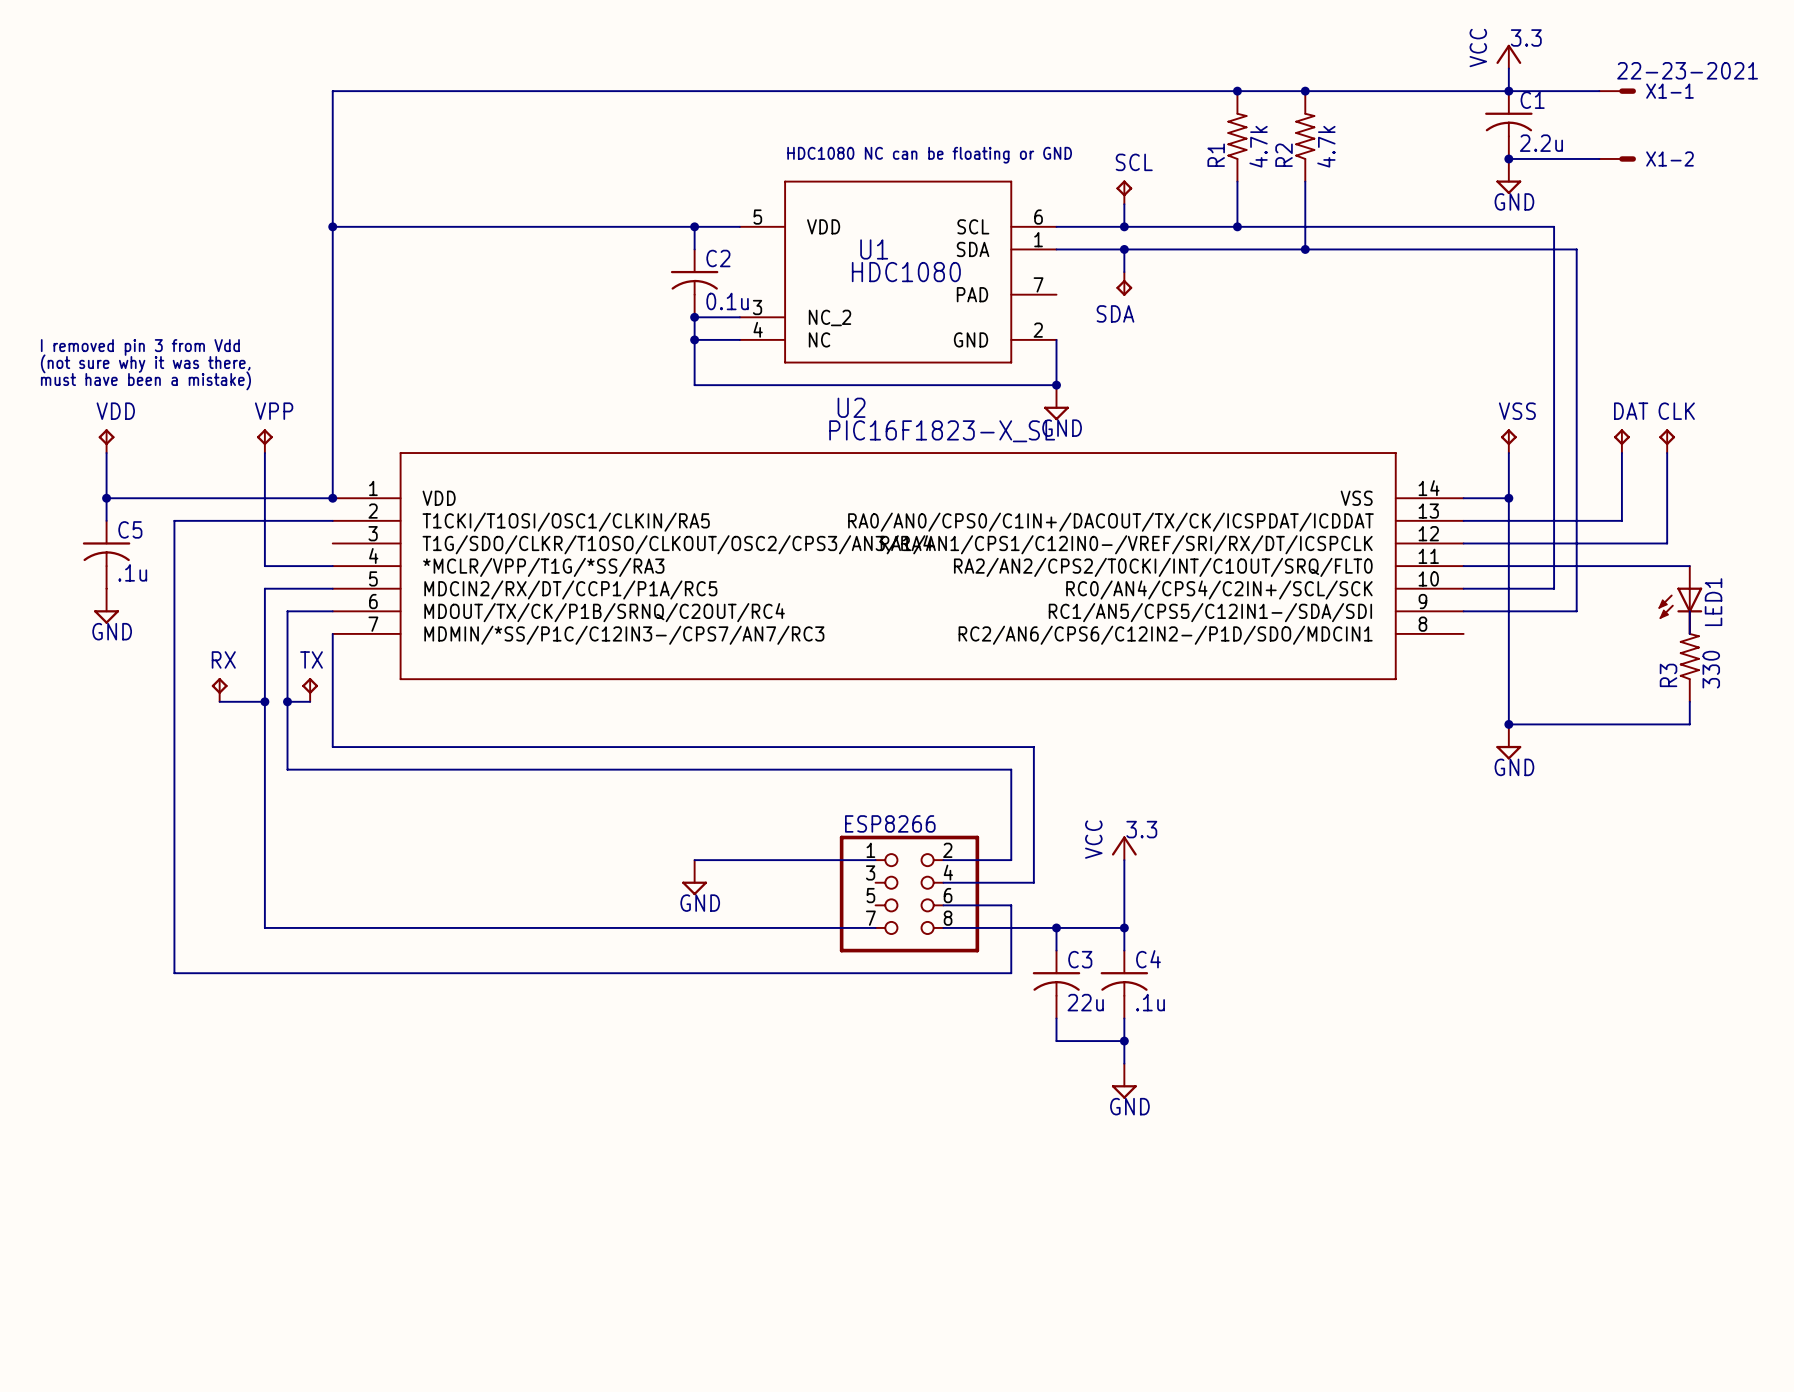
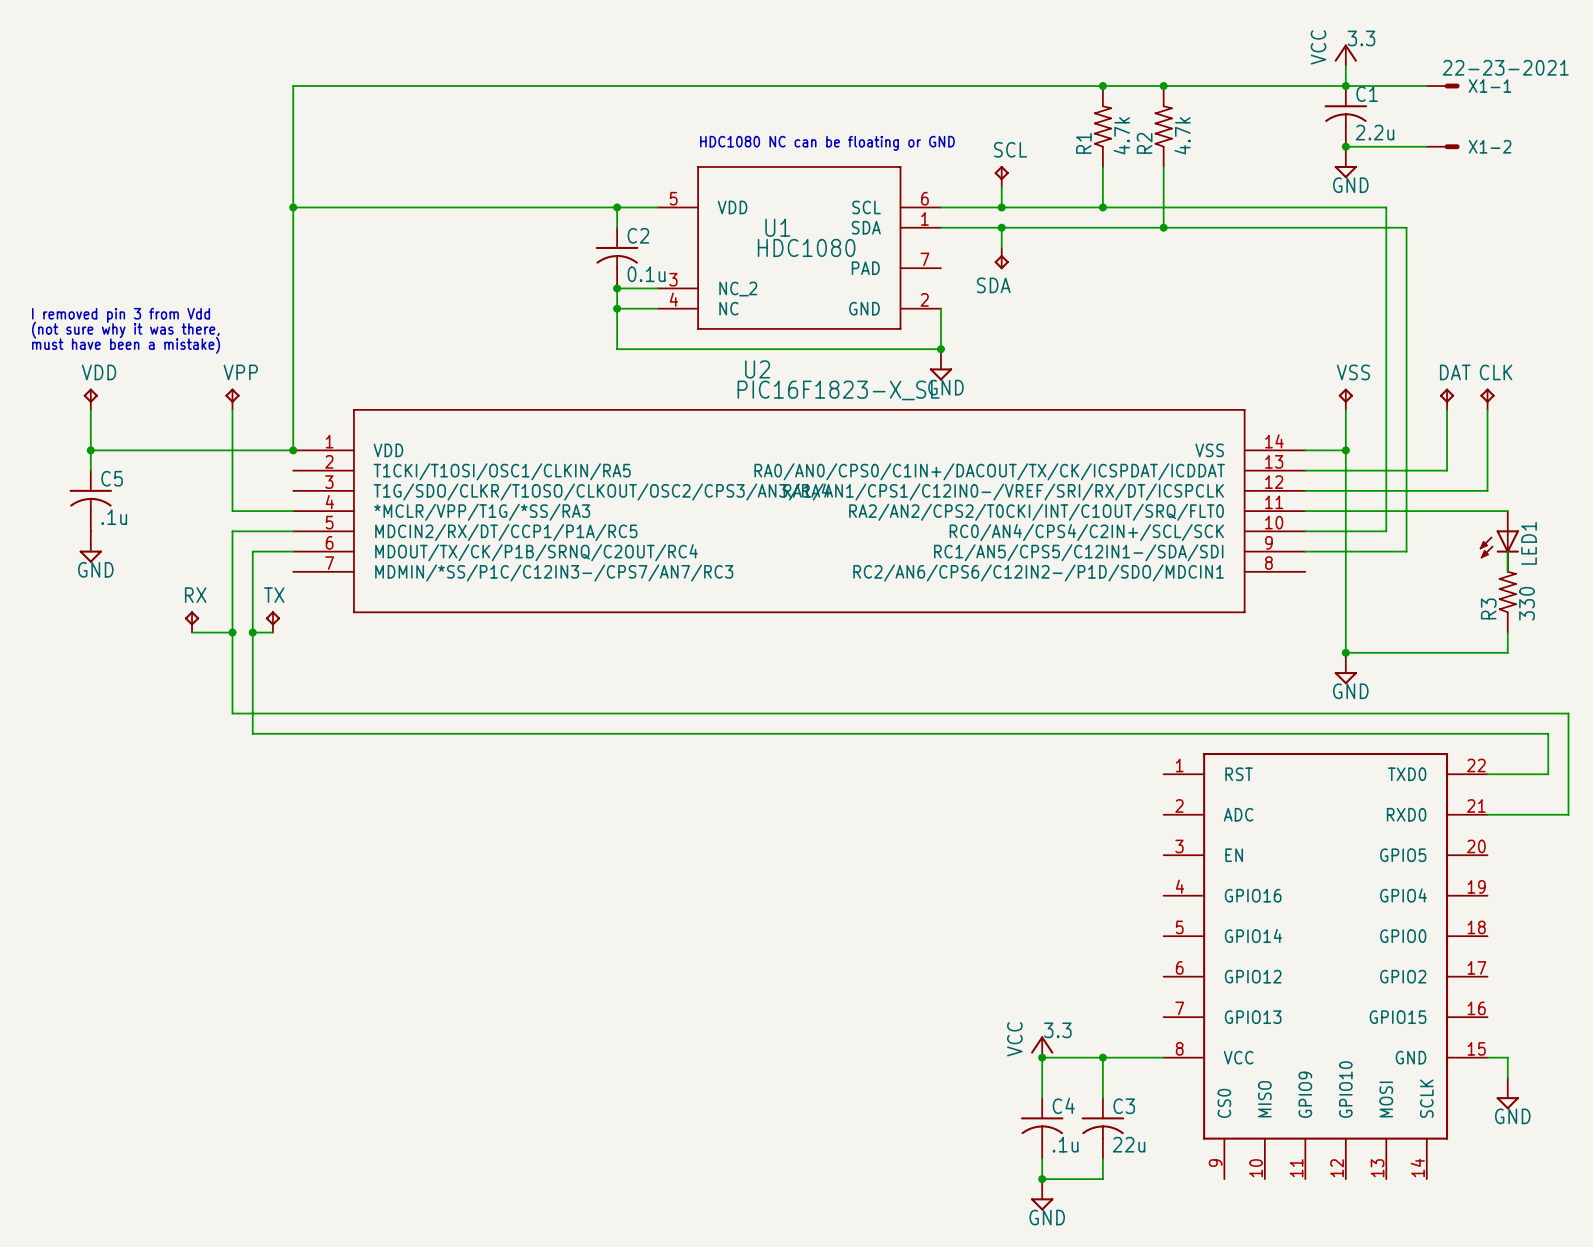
wire: (332, 520) (174, 520) (174, 973) (1011, 973) (1011, 905) (943, 905) -> none
wire: (332, 633) (332, 747) (1033, 747) (1033, 882) (943, 882) -> none
wire: (287, 769) (1011, 769) (1011, 860) (943, 860) -> (252, 693) (252, 733) (1548, 733) (1548, 774) (1487, 774)
wire: (264, 792) (264, 927) (875, 927) -> (232, 713) (1568, 713) (1568, 814) (1487, 814)
power symbol: VCC (1124, 848) -> none
wire: (694, 860) (875, 860) -> none
wire: (1124, 860) (1124, 950) -> none
power symbol: GND (694, 877) -> none
ESP8266: (909, 894) -> none
wire: (943, 927) (1124, 927) -> none
wire: (1056, 927) (1056, 950) -> none
junction: (1056, 927) -> none
junction: (1124, 927) -> none
C3 position: (1056, 984) -> (1102, 1128)
C4 position: (1124, 984) -> (1042, 1128)
wire: (1056, 1018) (1056, 1041) (1124, 1041) -> none
wire: (1124, 1018) (1124, 1063) -> (1102, 1057) (1102, 1098)
junction: (1124, 1041) -> none
part: none -> (1325, 966)
power symbol: GND (1124, 1081) -> none
power symbol: none -> VCC (1042, 1047)
junction: none -> (1042, 1057)
junction: none -> (1102, 1057)
wire: none -> (1163, 1057) (1042, 1057) (1042, 1098)
wire: none -> (1487, 1057) (1507, 1057) (1507, 1077)
power symbol: none -> GND (1507, 1093)
wire: none -> (1042, 1158) (1042, 1179) (1102, 1179) (1102, 1158)
junction: none -> (1042, 1179)
power symbol: none -> GND (1042, 1194)

